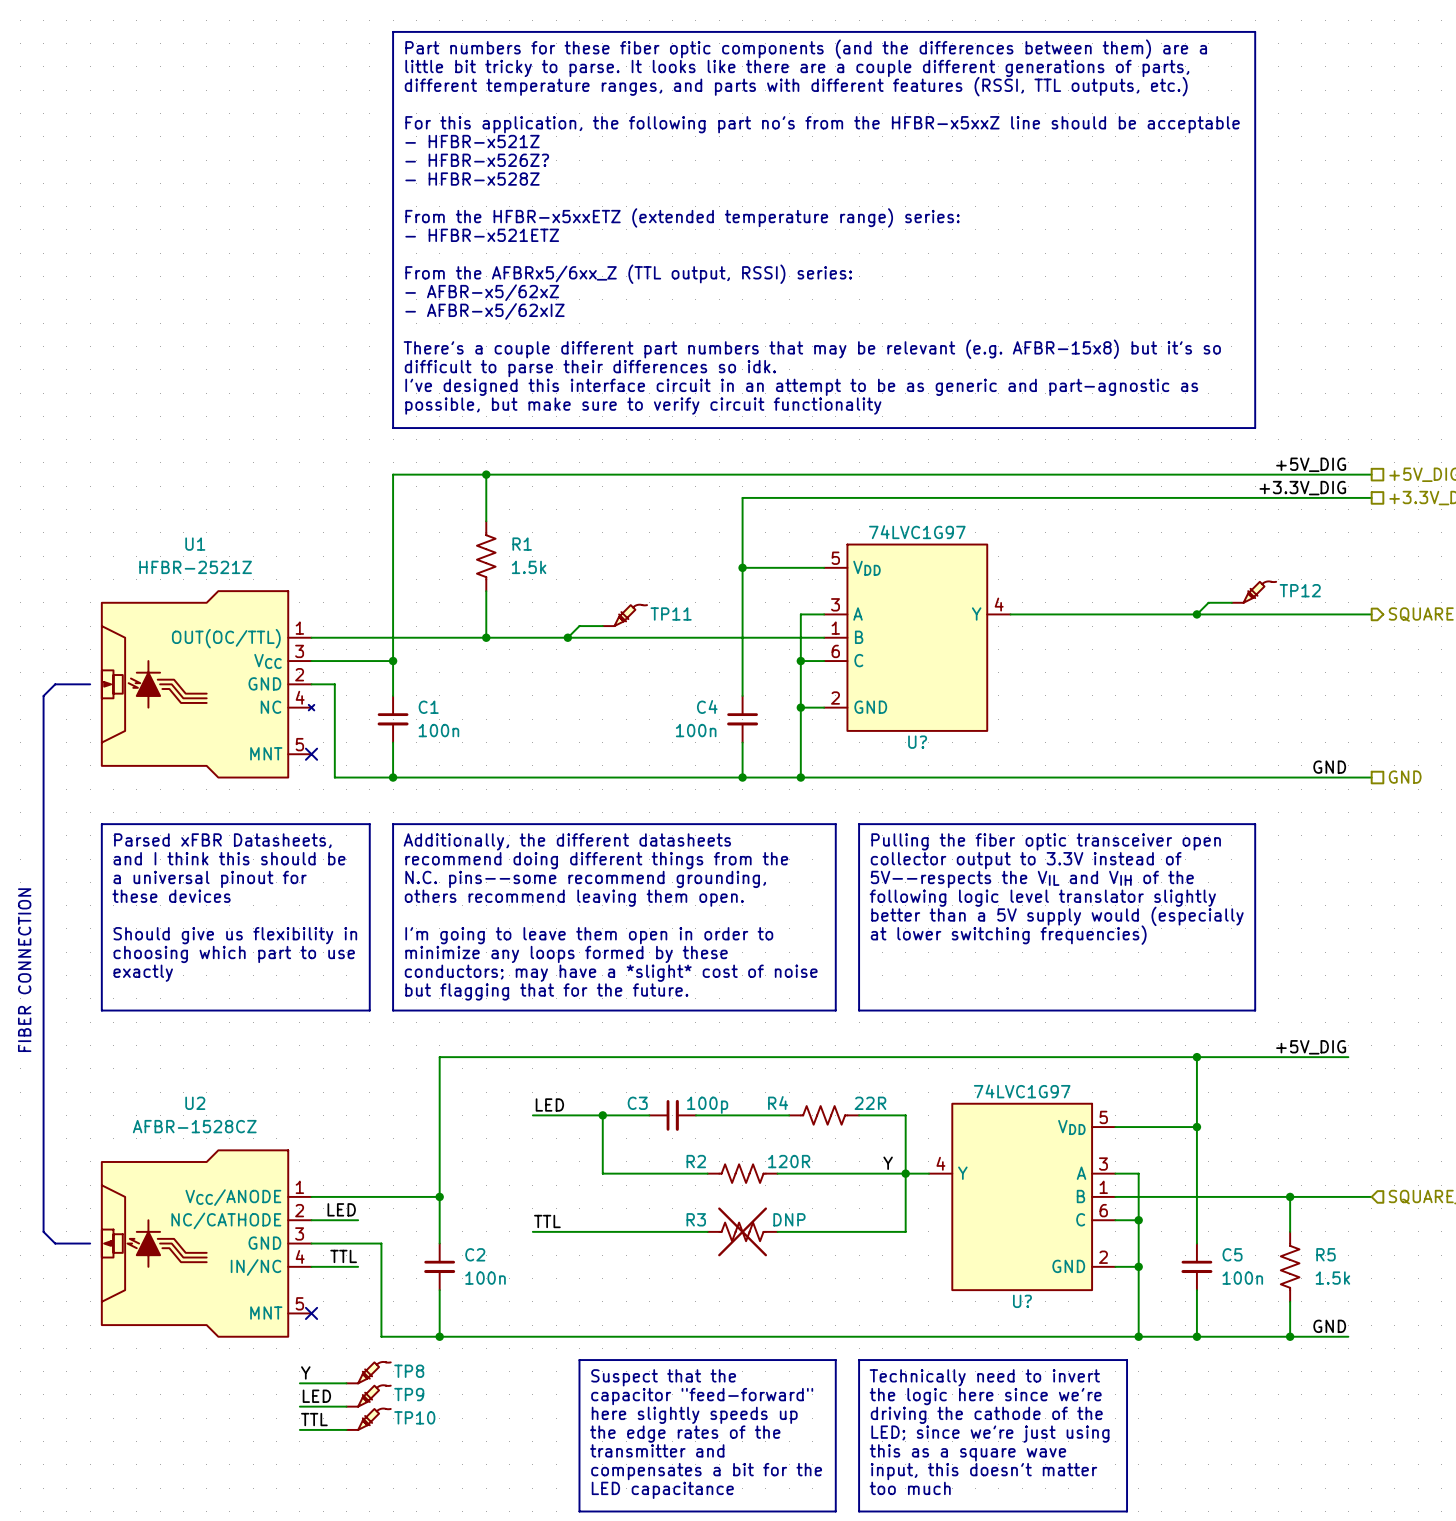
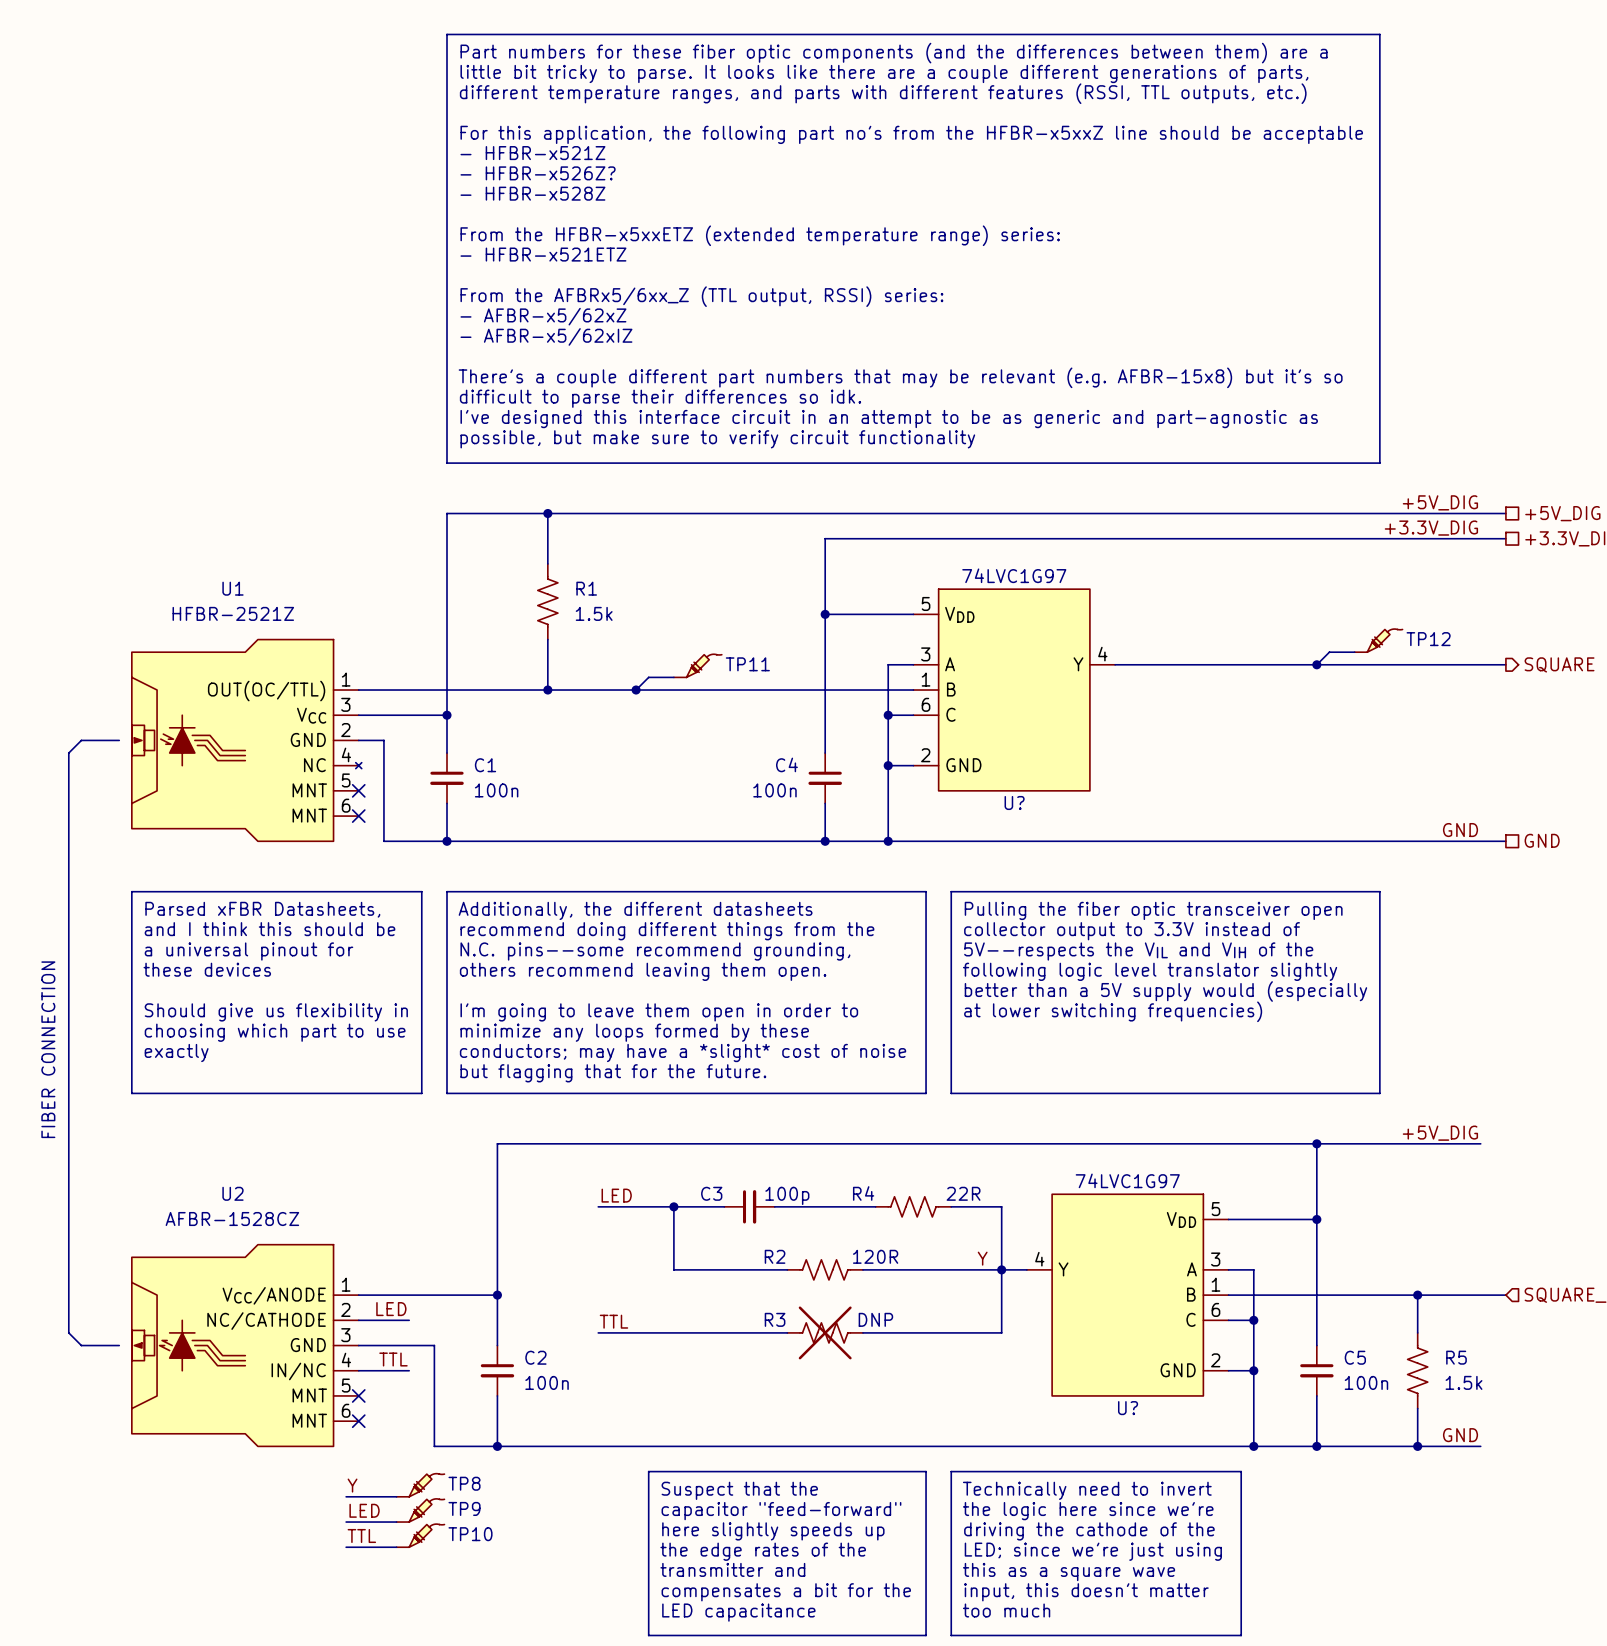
U1 symbol: [101, 591, 315, 778] -> [131, 639, 362, 842]
no-connect mark: none -> (358, 790)
U2 symbol: [101, 1150, 312, 1337] -> [131, 1244, 359, 1447]
no-connect mark: none -> (358, 1395)

